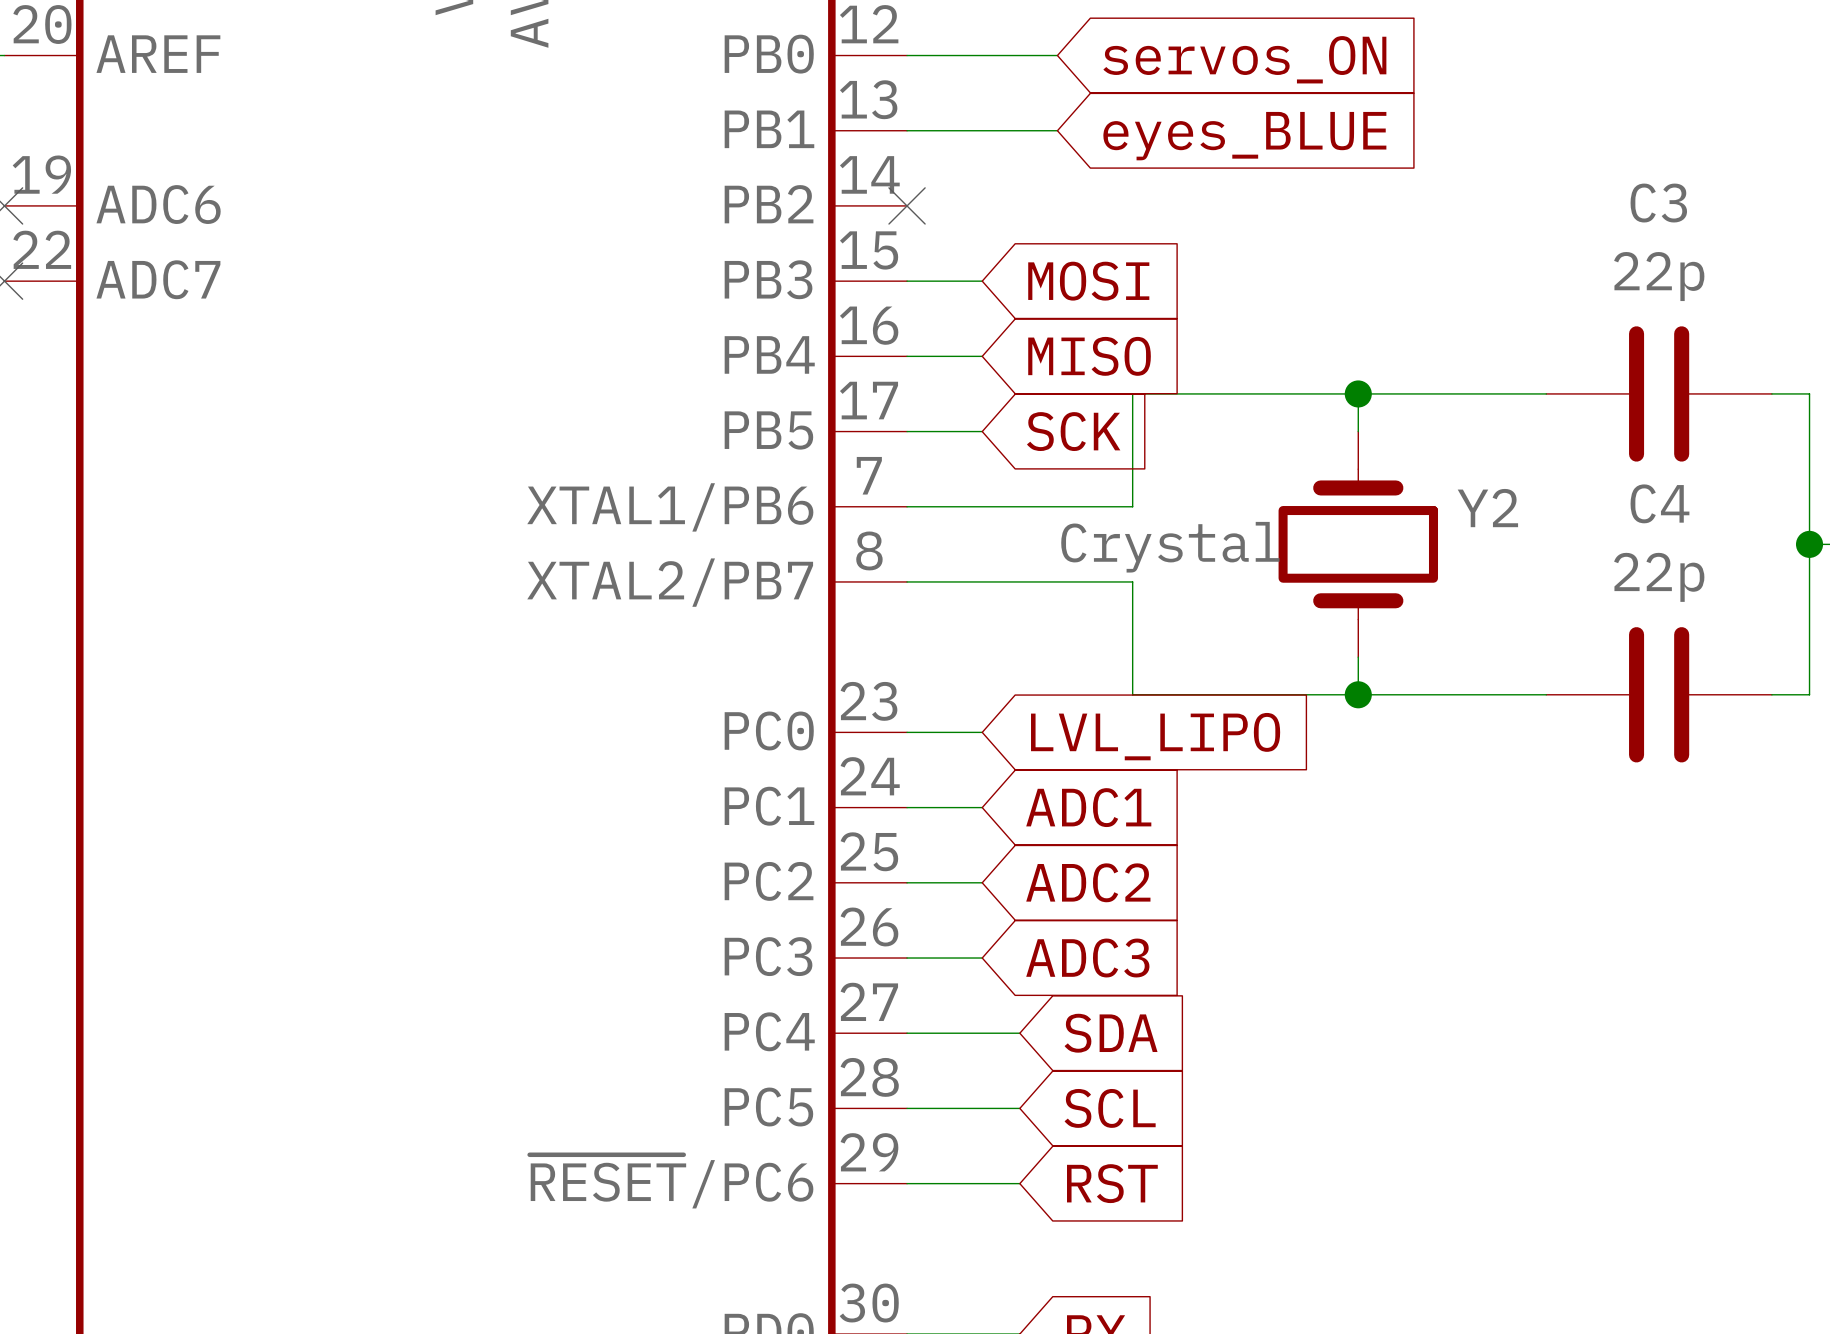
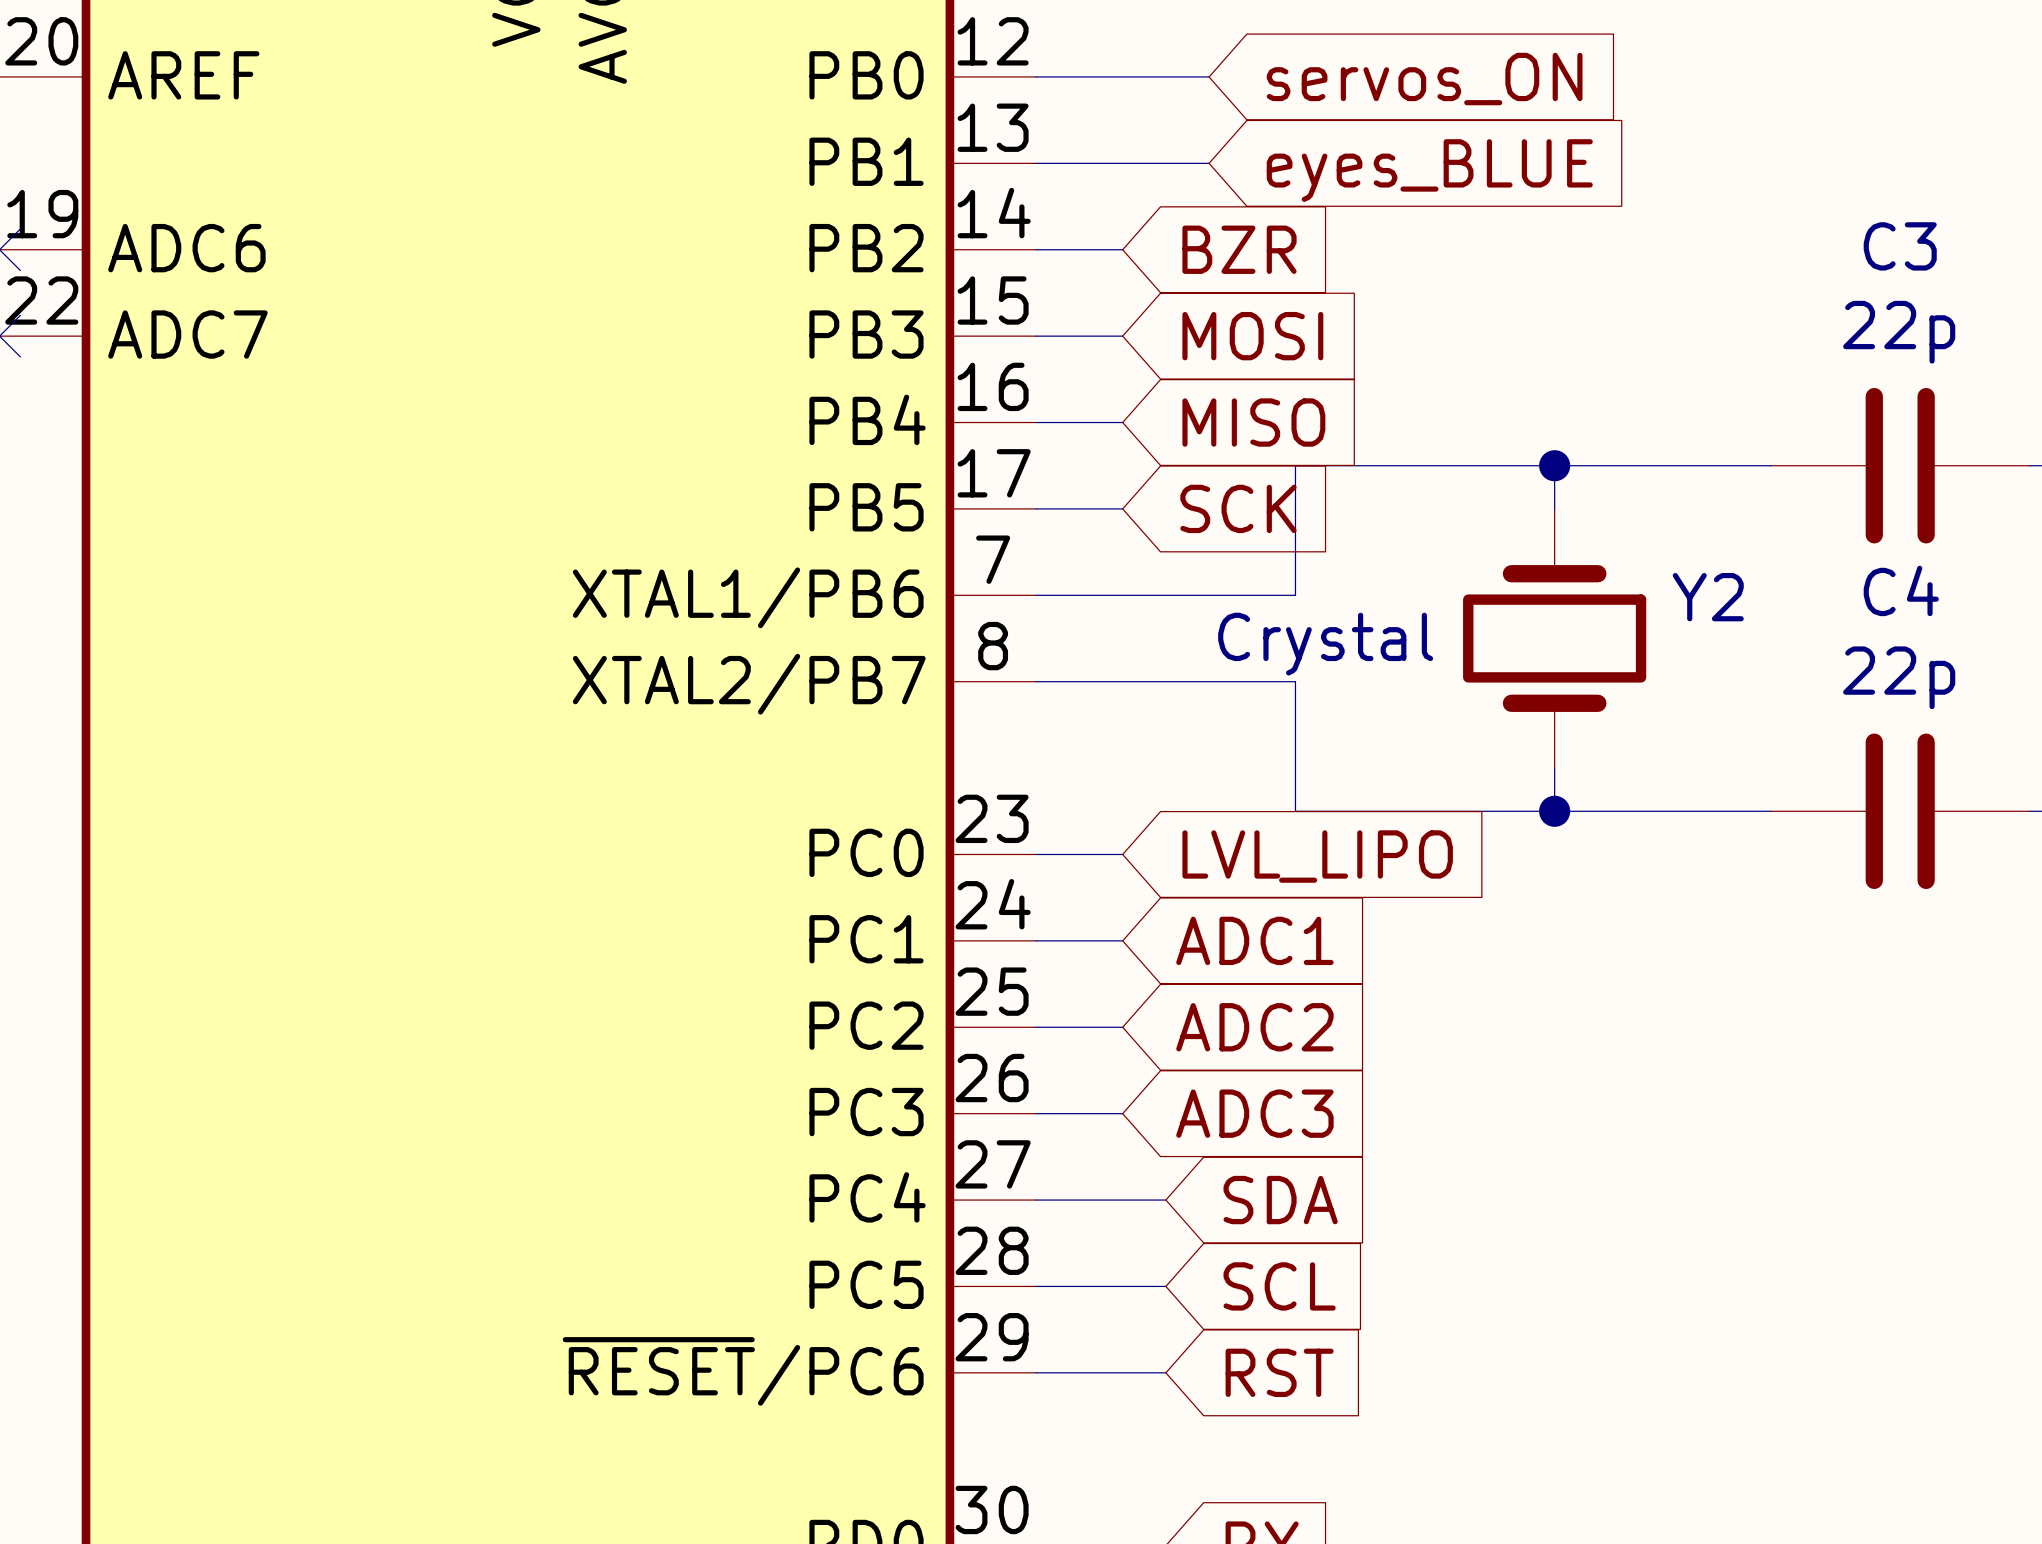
wire: none -> (1036, 249) (1122, 249)
no-connect mark: (907, 205) -> none
global label: none -> BZR (1239, 249)

